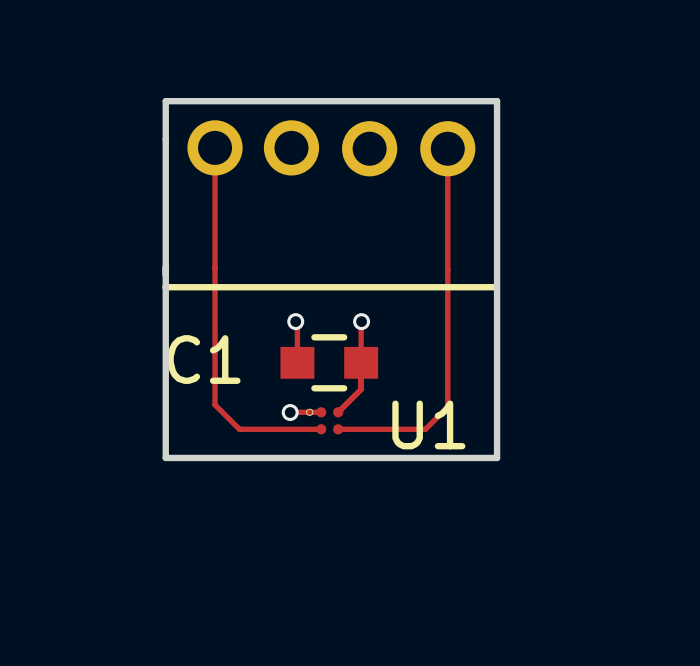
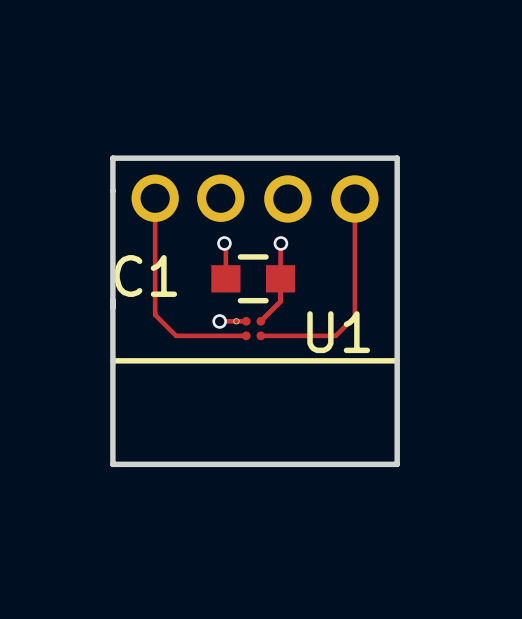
top track: (215, 147) (215, 268) -> none
part position: (331, 148) -> (255, 198)
top track: (447, 148) (447, 269) -> none
board edge: (165, 222) (165, 101) (497, 101) (497, 222) -> (112, 158) (397, 158)
line: (165, 287) (496, 287) -> (112, 360) (397, 360)
board edge: (165, 457) (497, 457) -> (112, 360) (112, 464) (397, 464) (397, 360)

